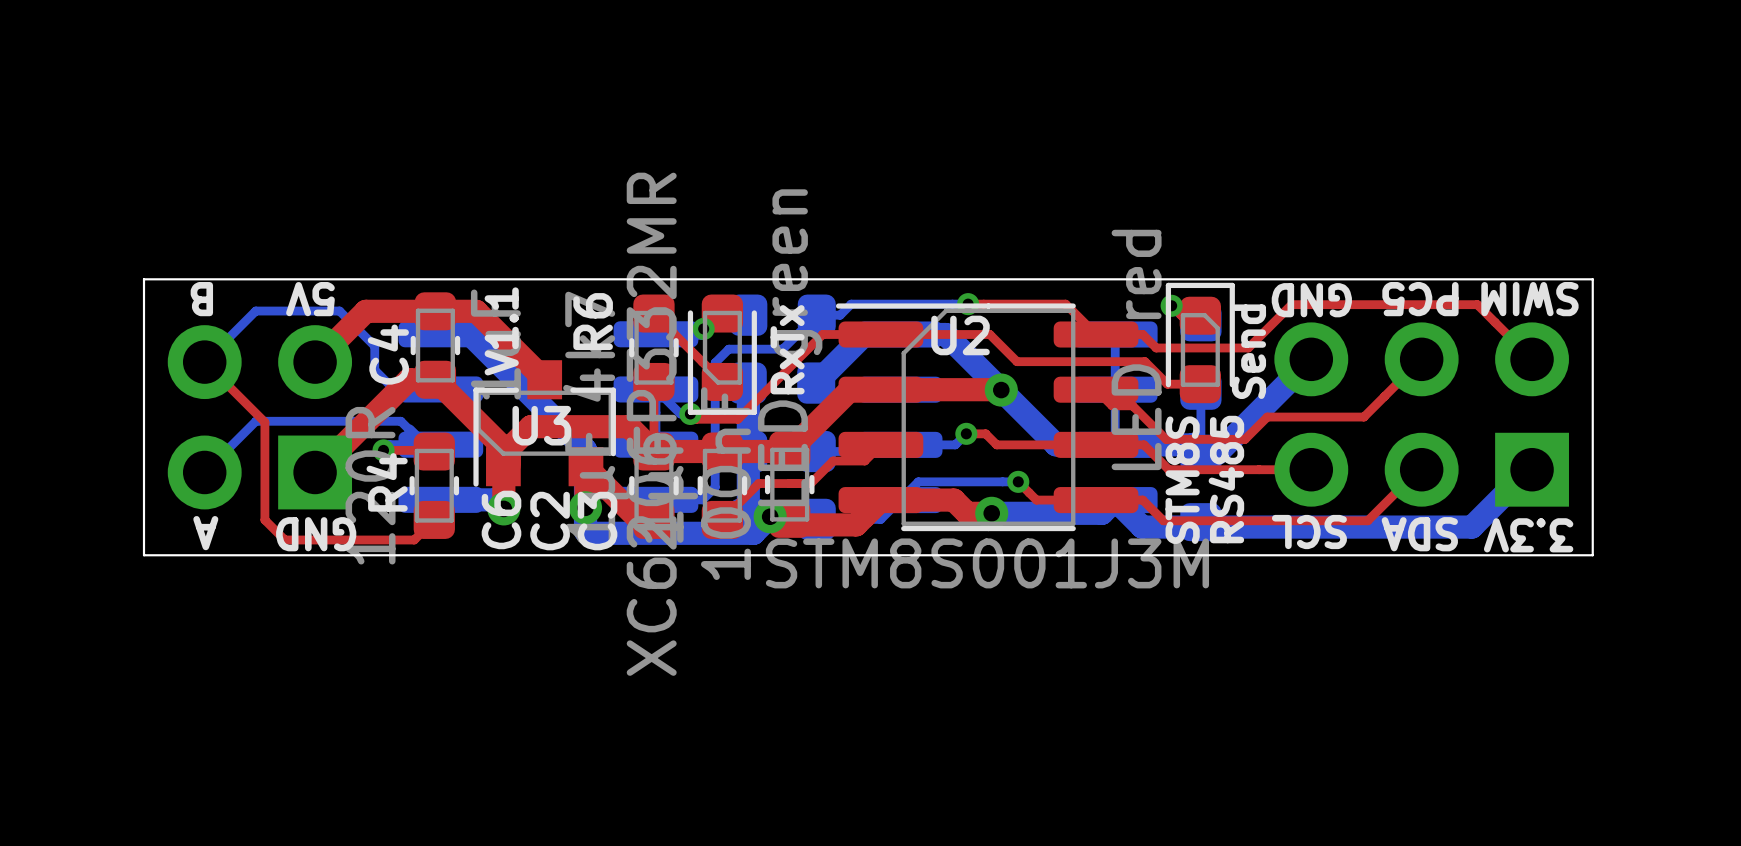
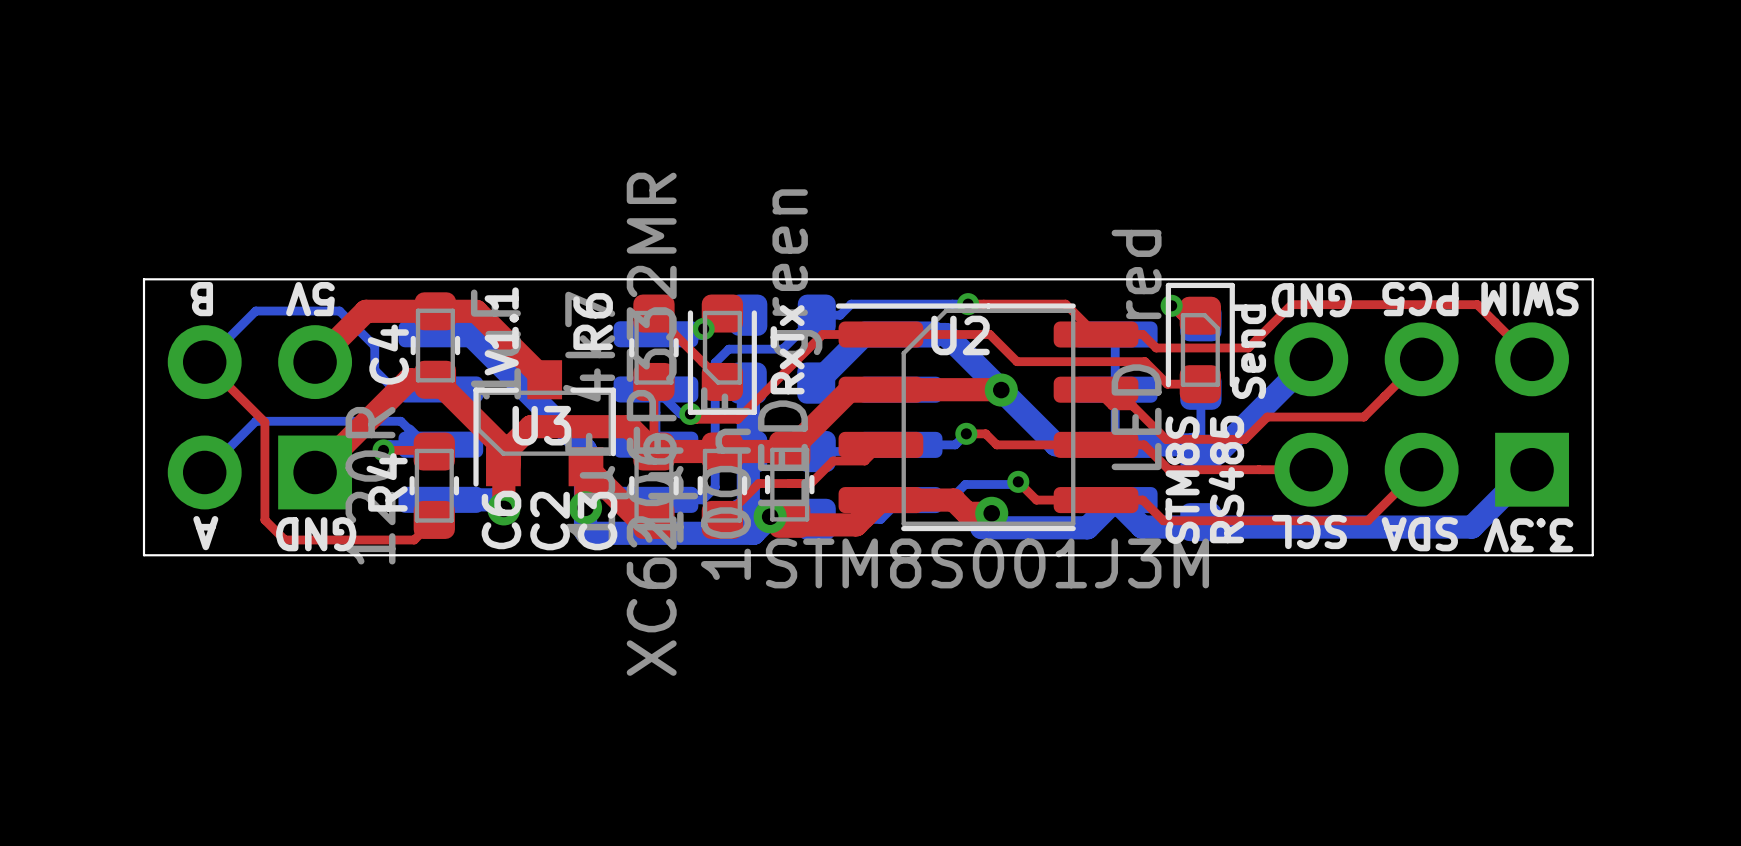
bottom track: (1018, 481) (918, 481) (900, 500) -> (1017, 484) (965, 484) (949, 500) (900, 500)
bottom track: (991, 513) (1101, 513) -> (981, 527) (1087, 527) (1101, 513)

